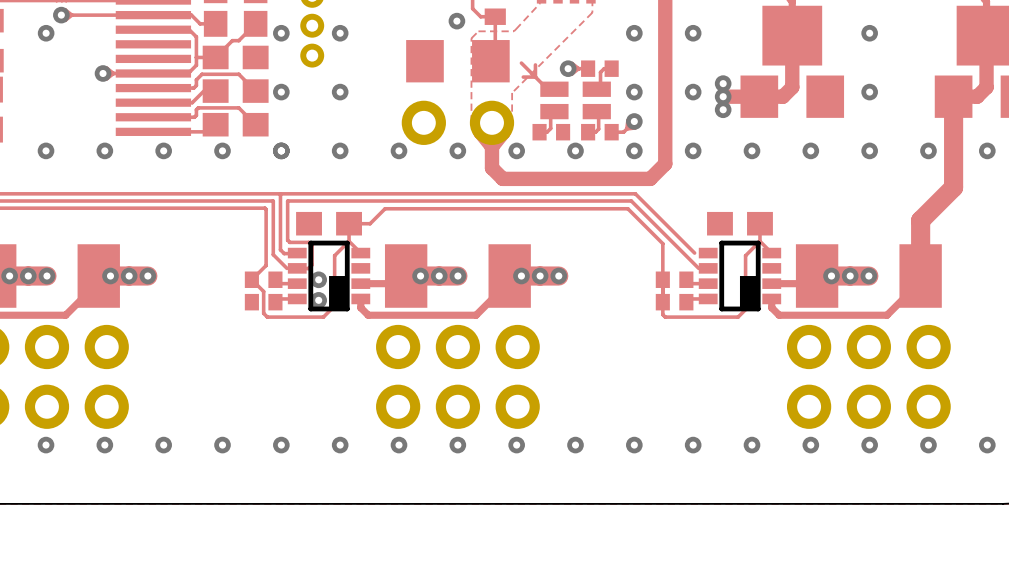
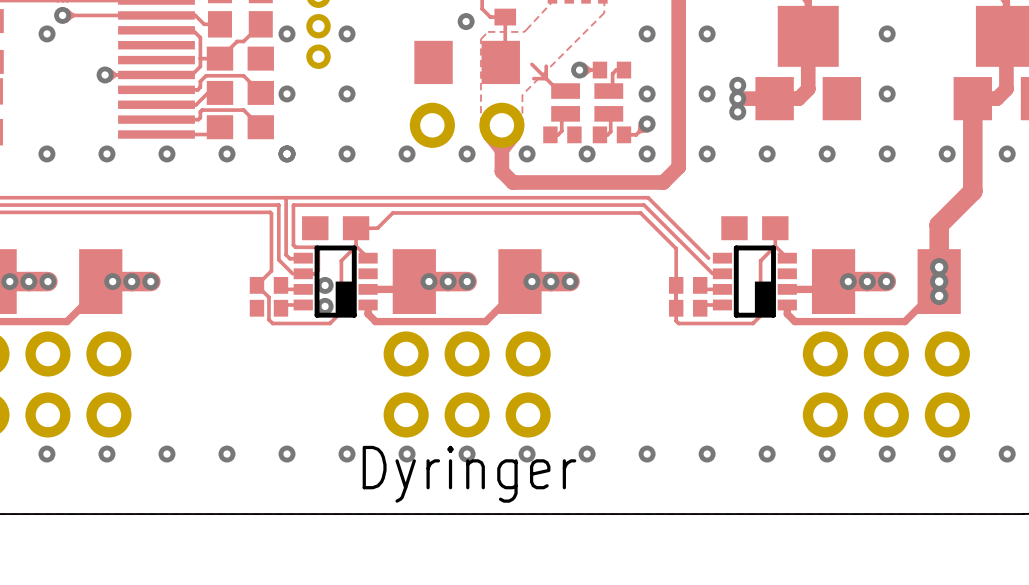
via: none -> (939, 267)
via: none -> (939, 281)
via: none -> (939, 295)
text: none -> Dyringer (469, 474)

